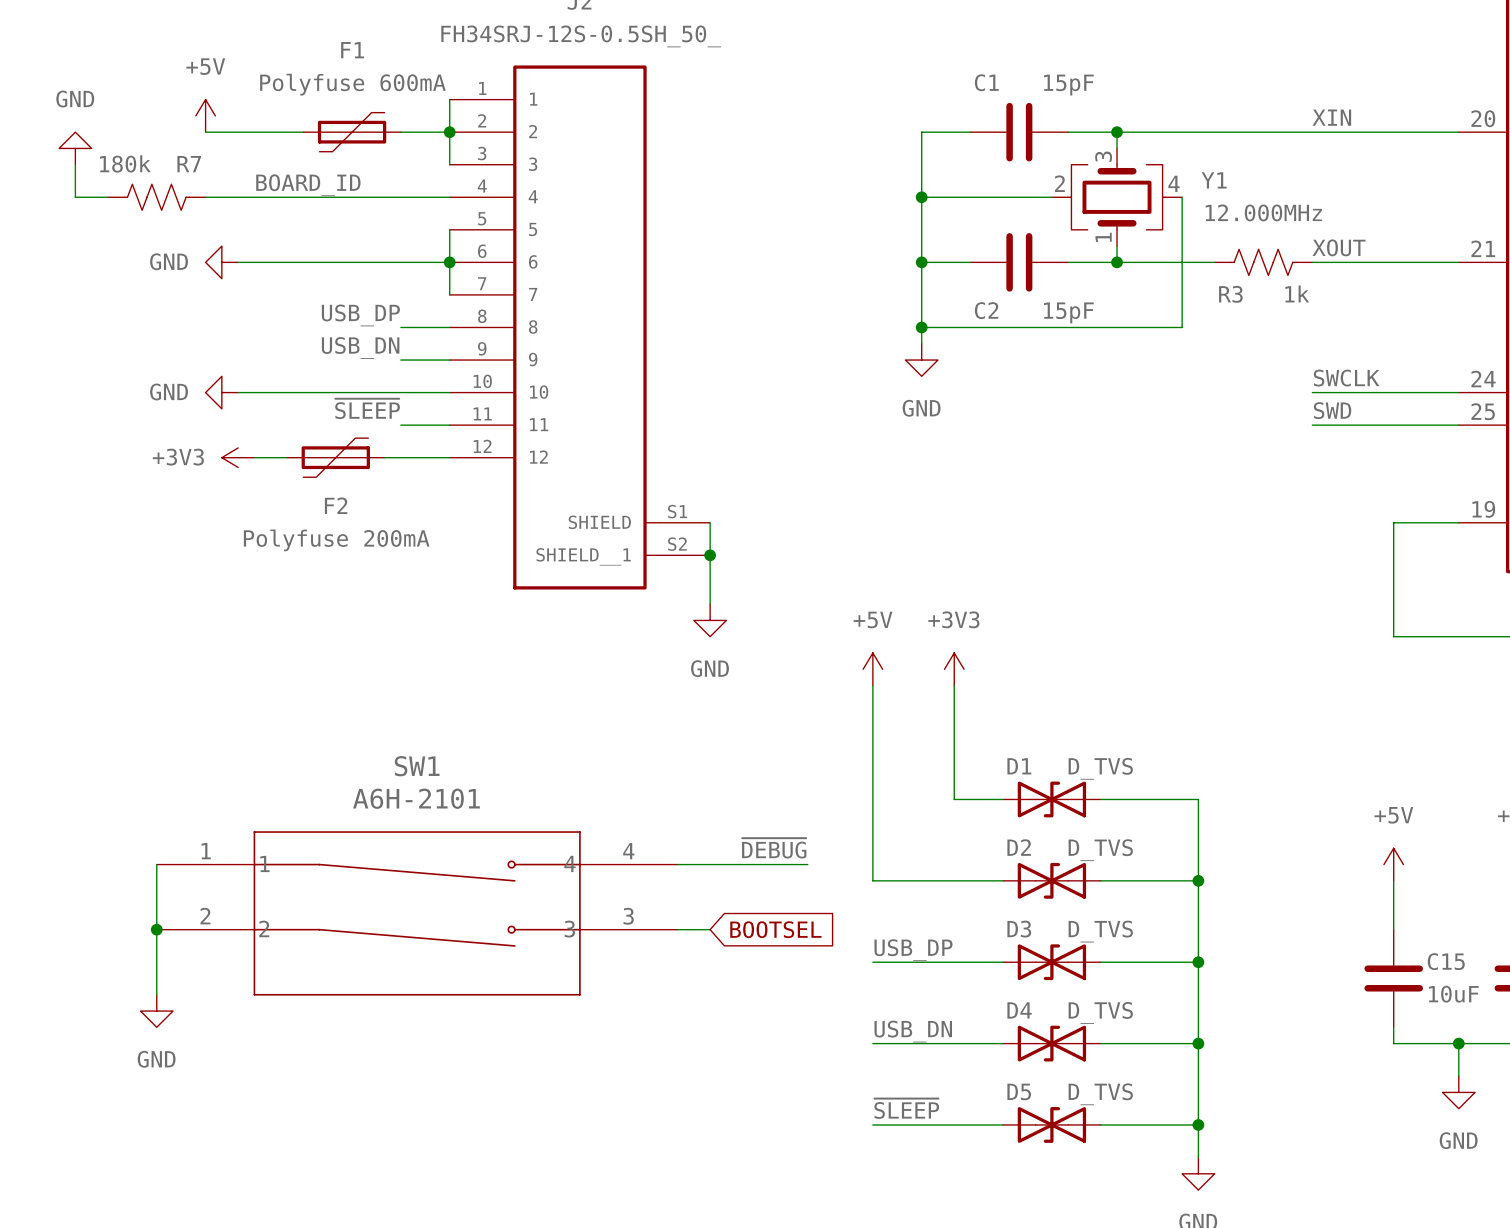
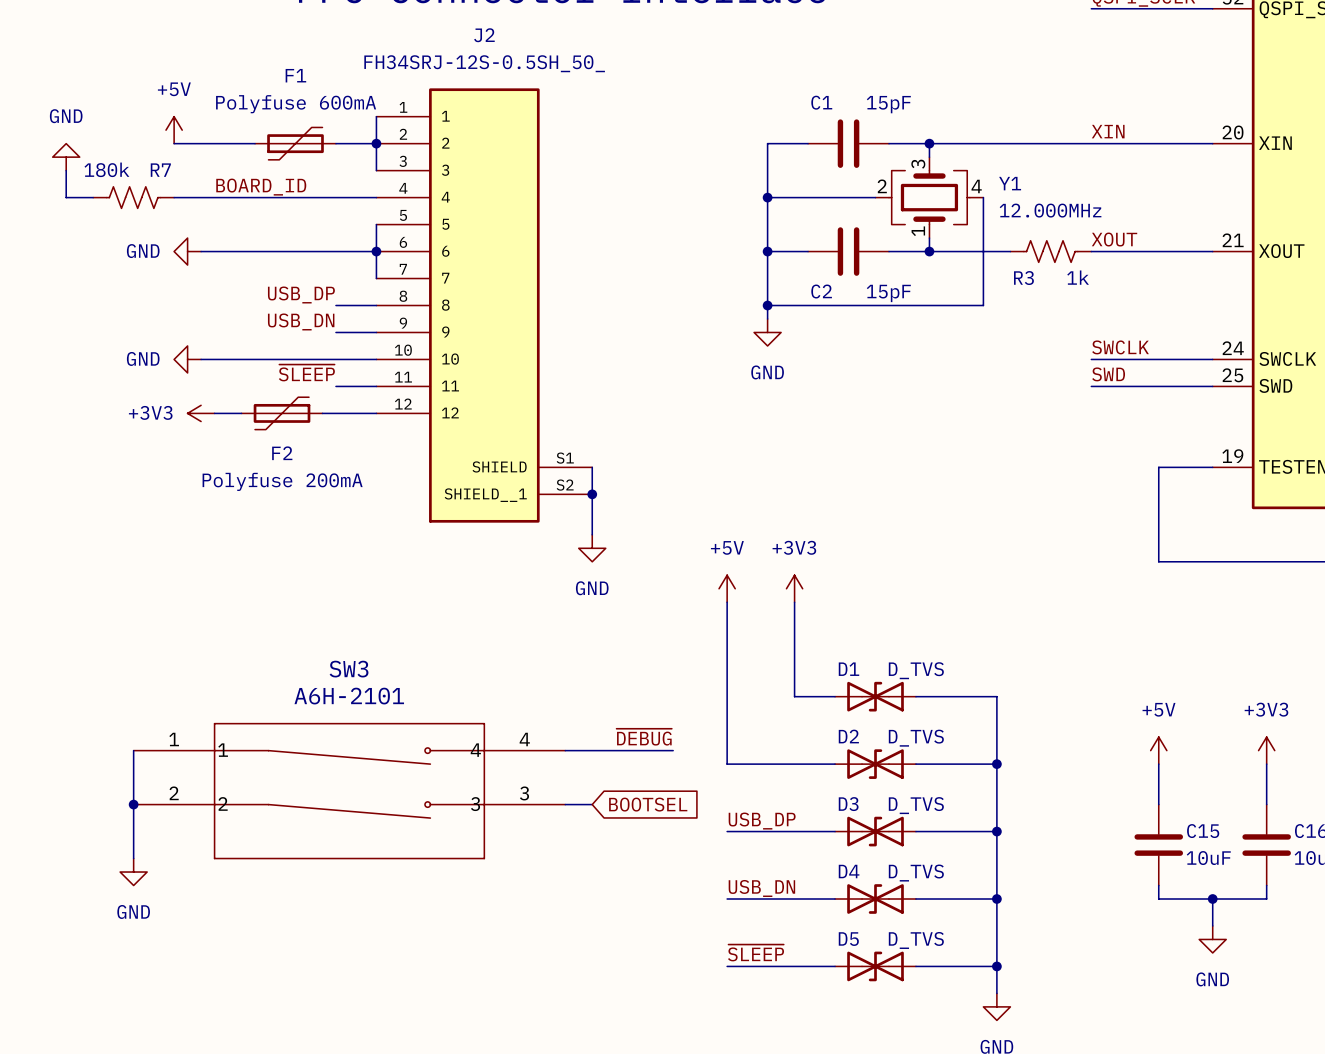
SW1 name: SW1 (417, 766) -> SW3 (349, 669)

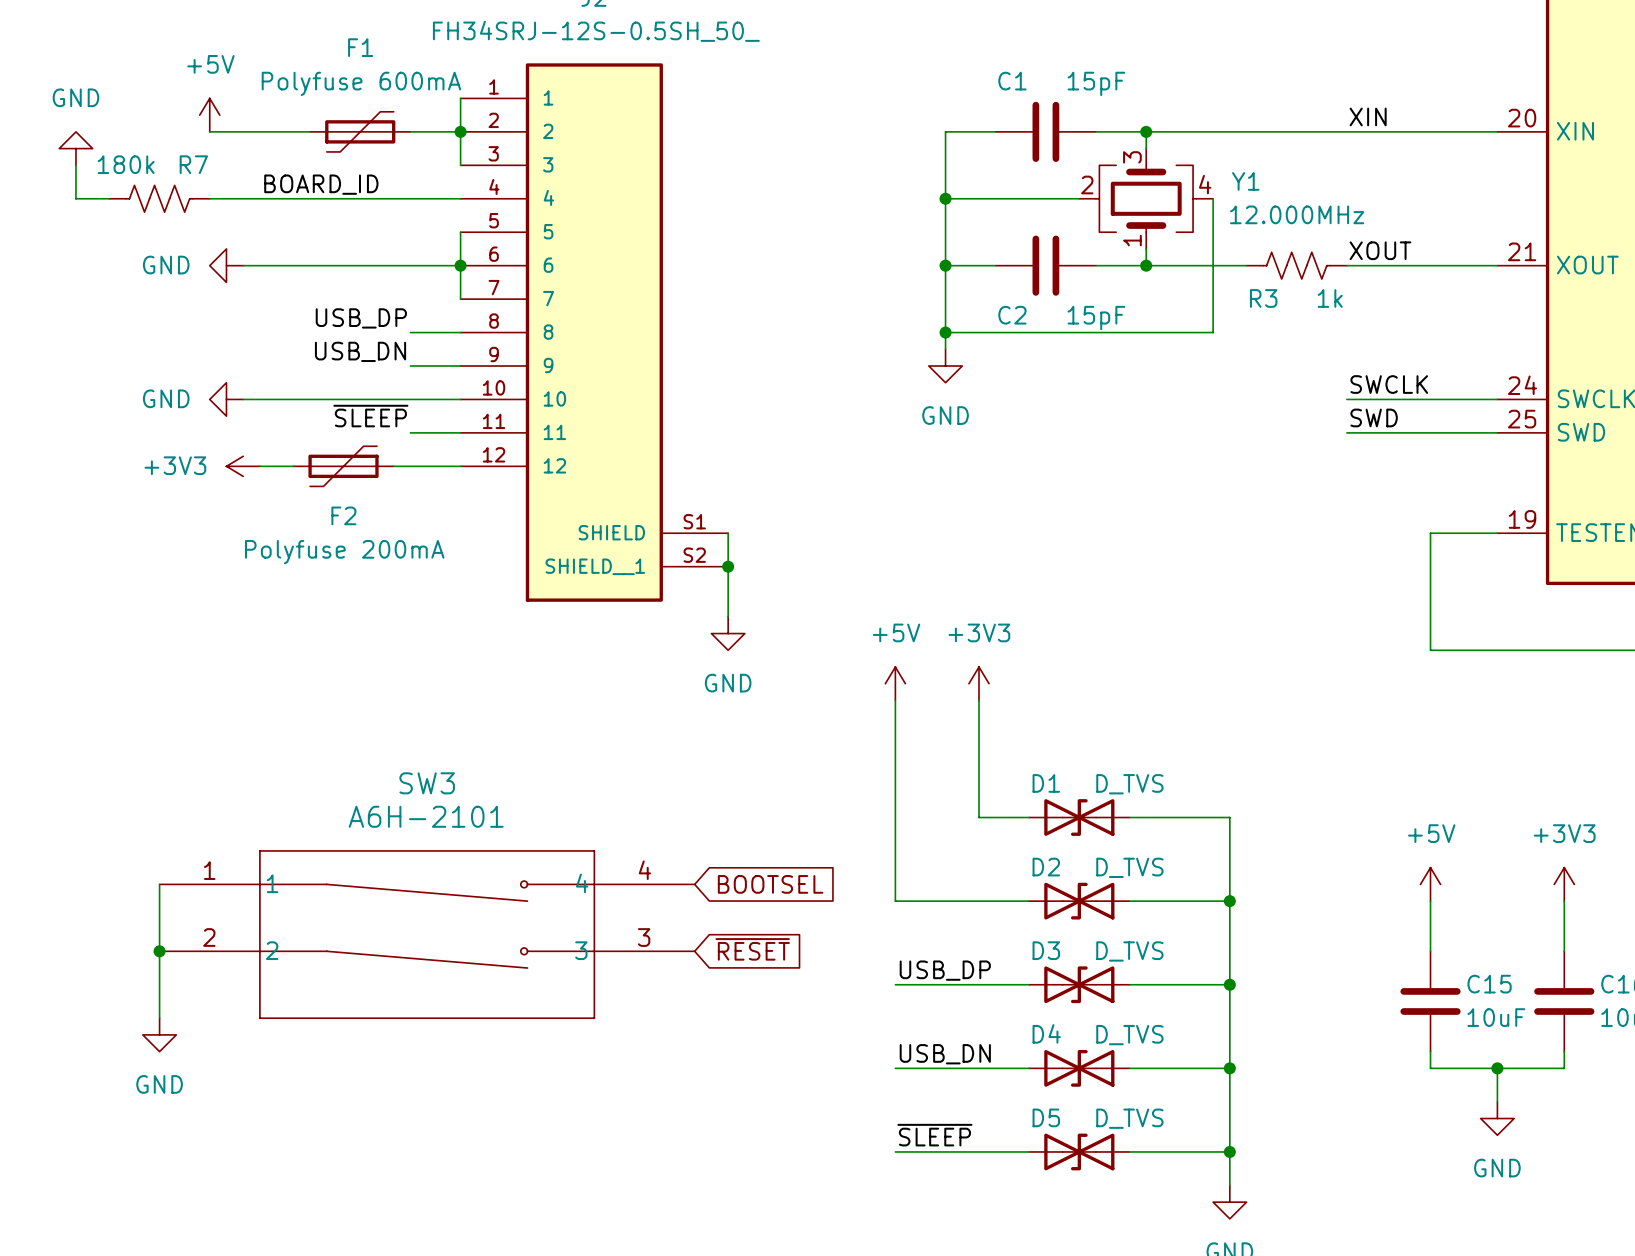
label: ~{DEBUG} (644, 737) -> none
wire: (565, 750) (673, 750) -> none
global label: none -> ~{RESET} (752, 949)
wire: (565, 804) (592, 804) -> none
global label position: BOOTSEL (648, 804) -> BOOTSEL (770, 884)

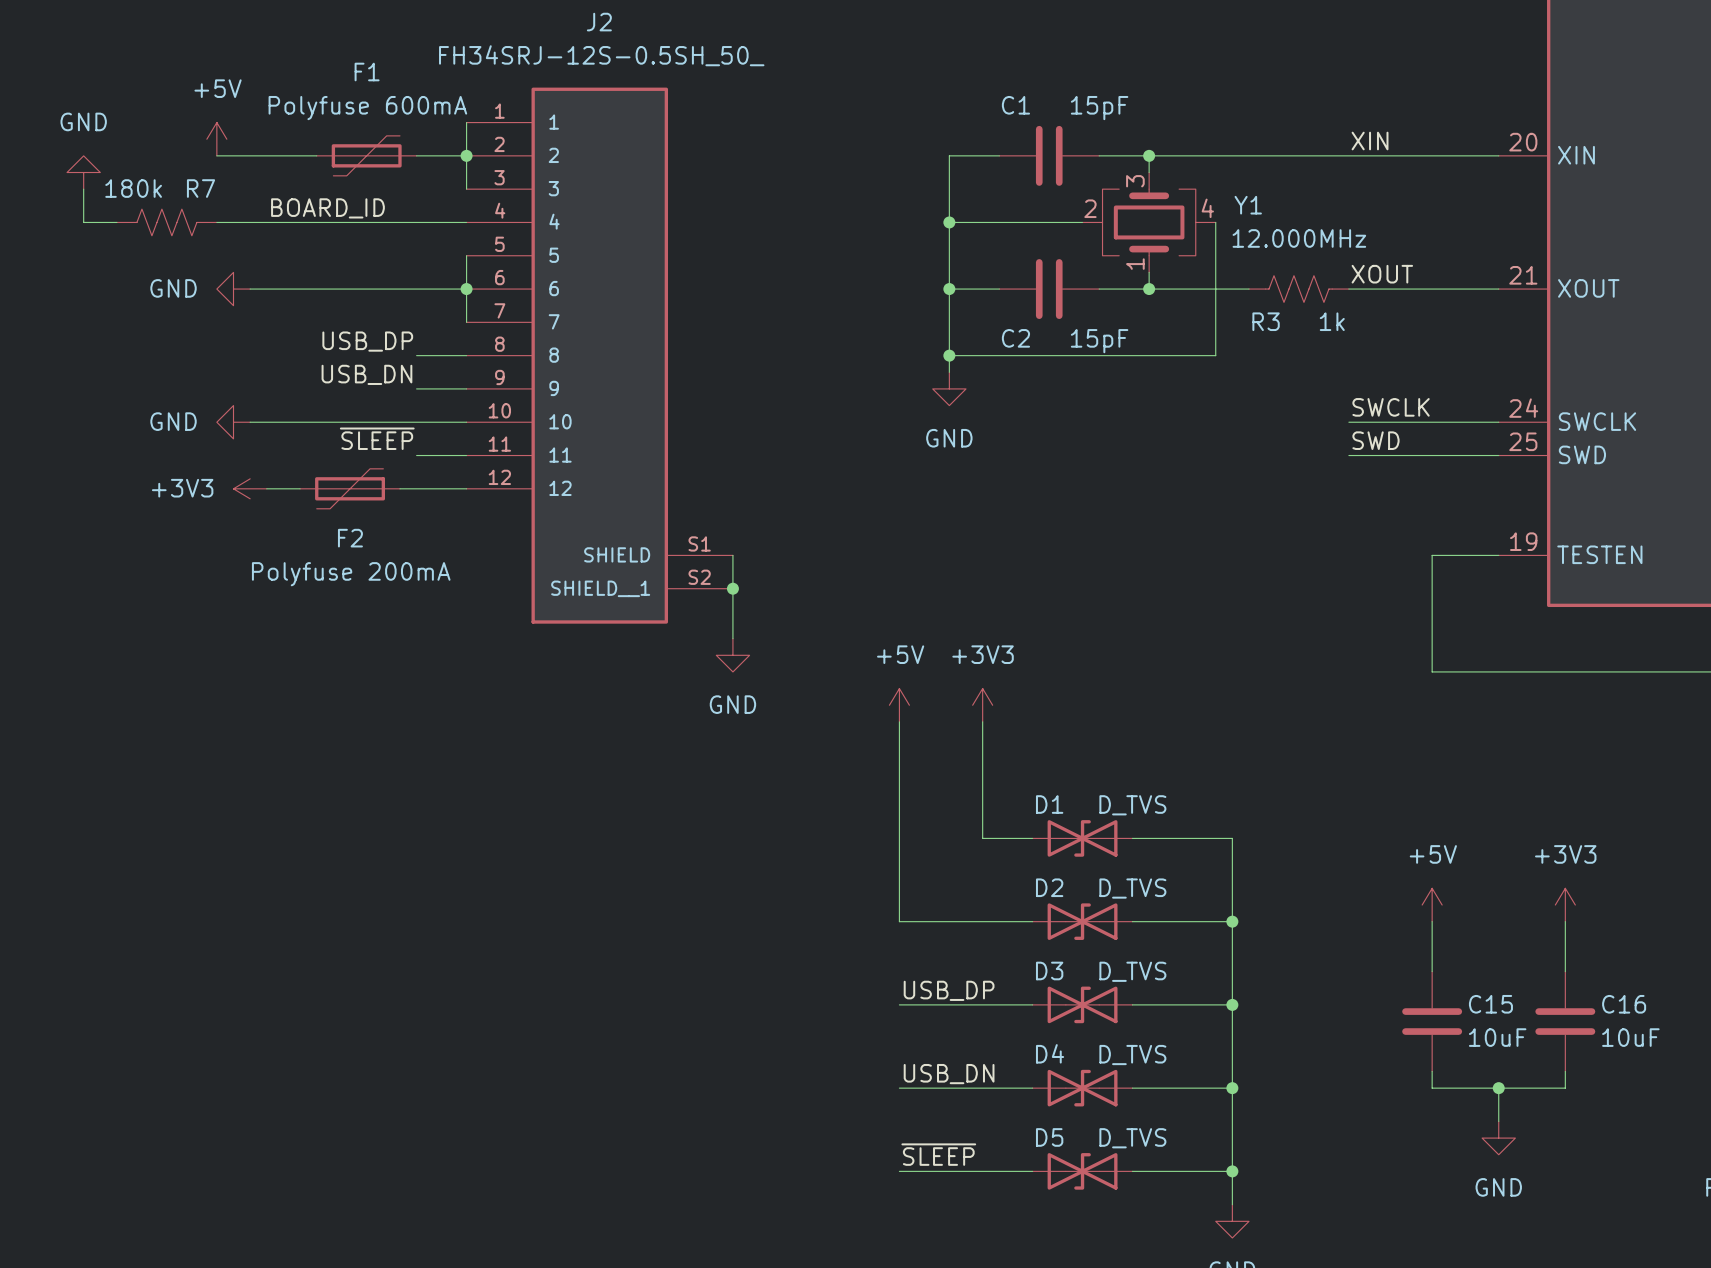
wire: (159, 884) (159, 1018) -> none
global label: BOOTSEL (770, 884) -> none
SW3: A6H-2101 (427, 934) -> none
global label: ~{RESET} (752, 949) -> none
junction: (159, 951) -> none
power symbol: GND (159, 1034) -> none

